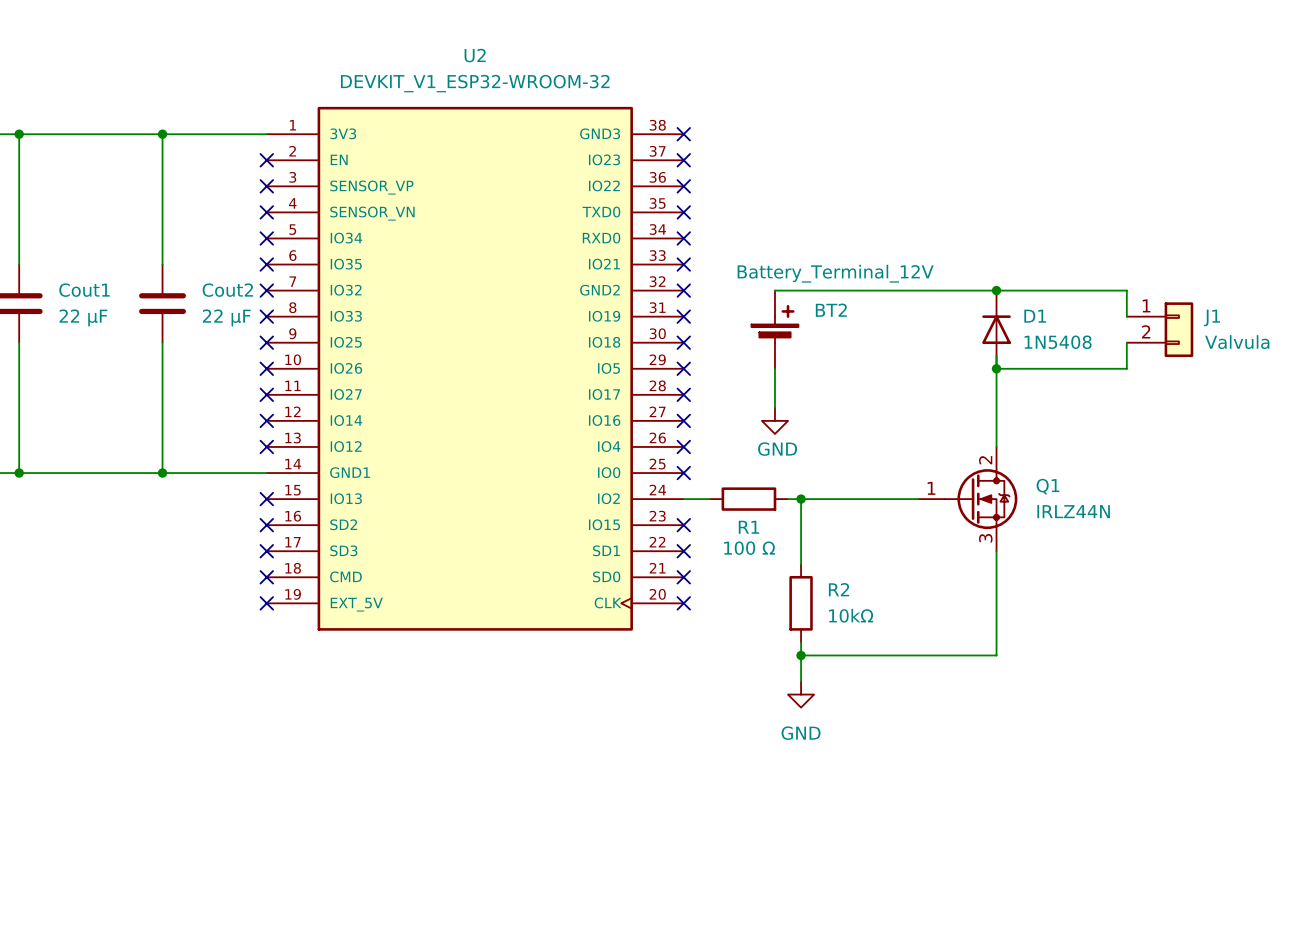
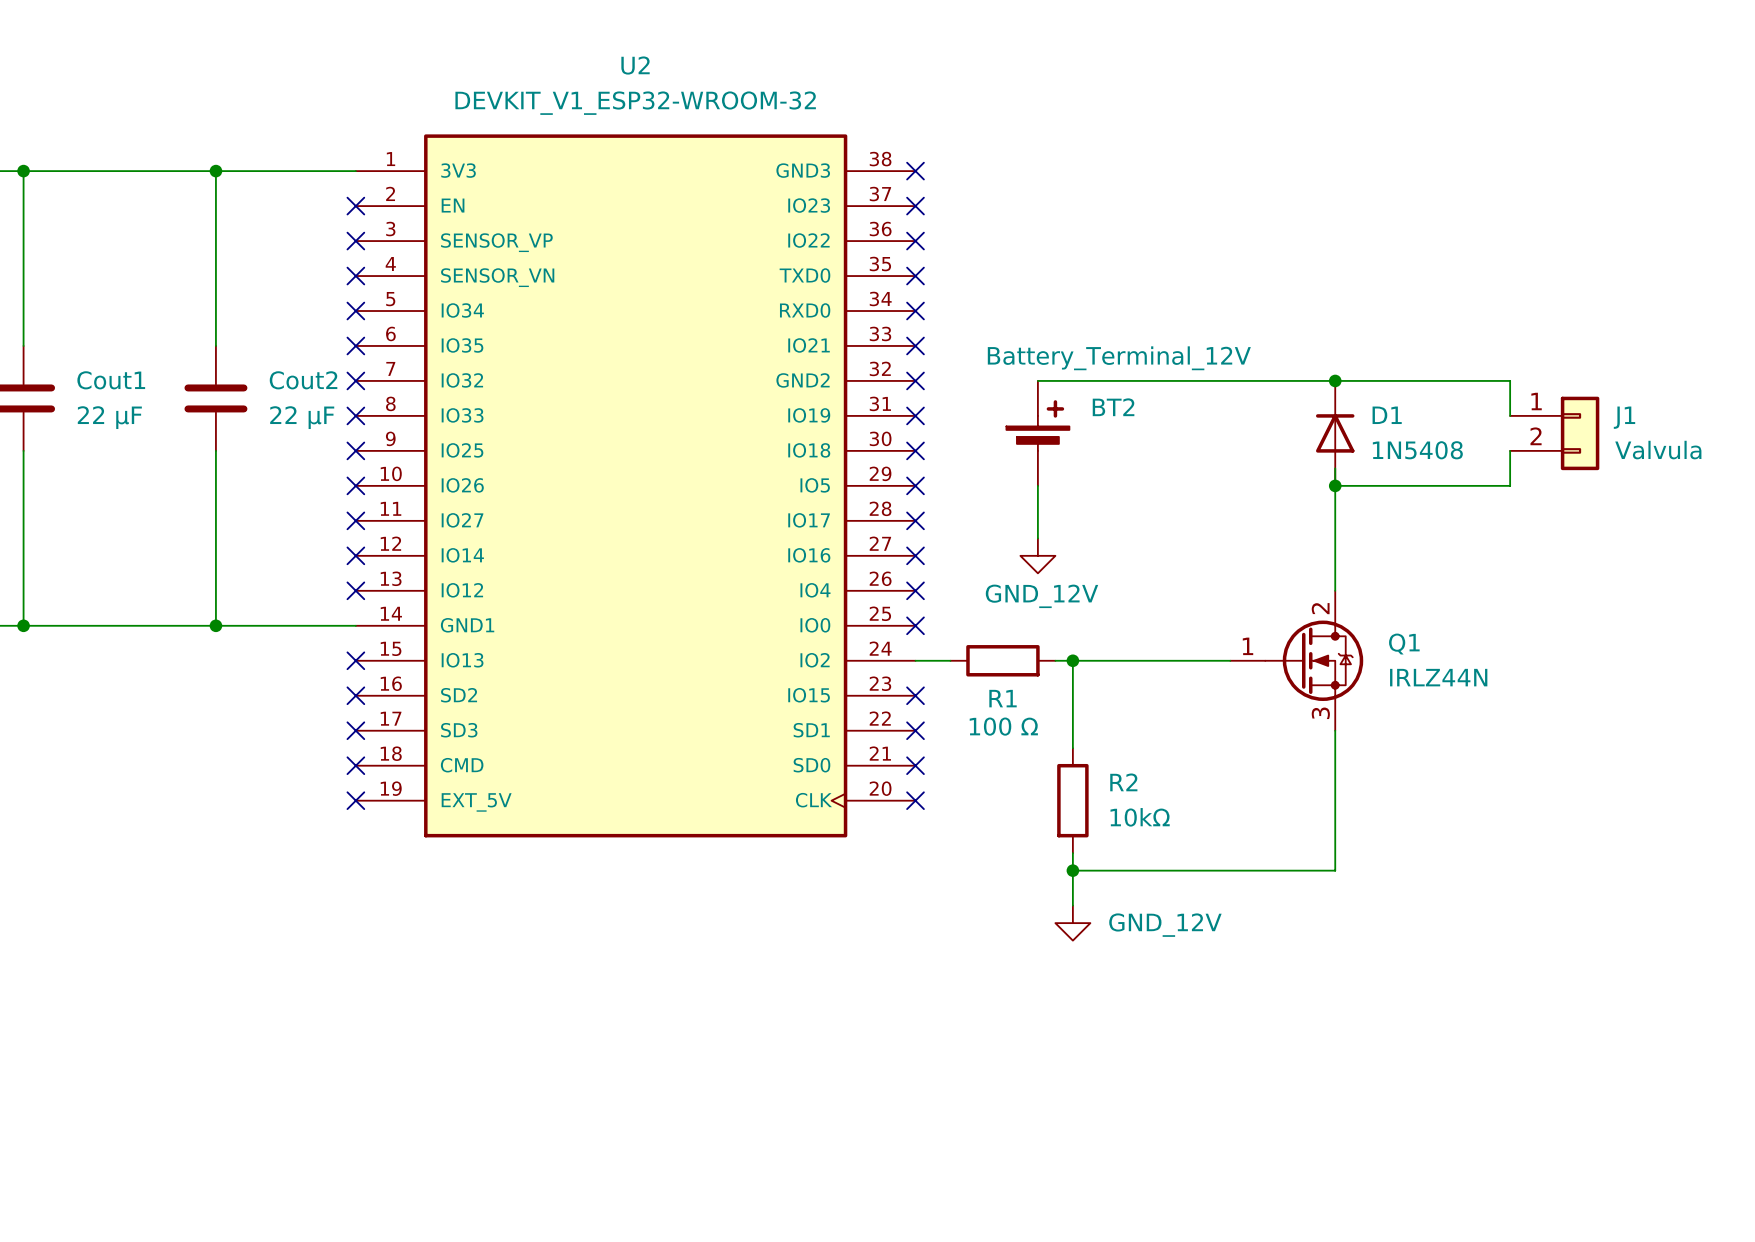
power symbol: GND (774, 420) -> GND_12V (1037, 555)
power symbol: GND (801, 694) -> GND_12V (1072, 923)

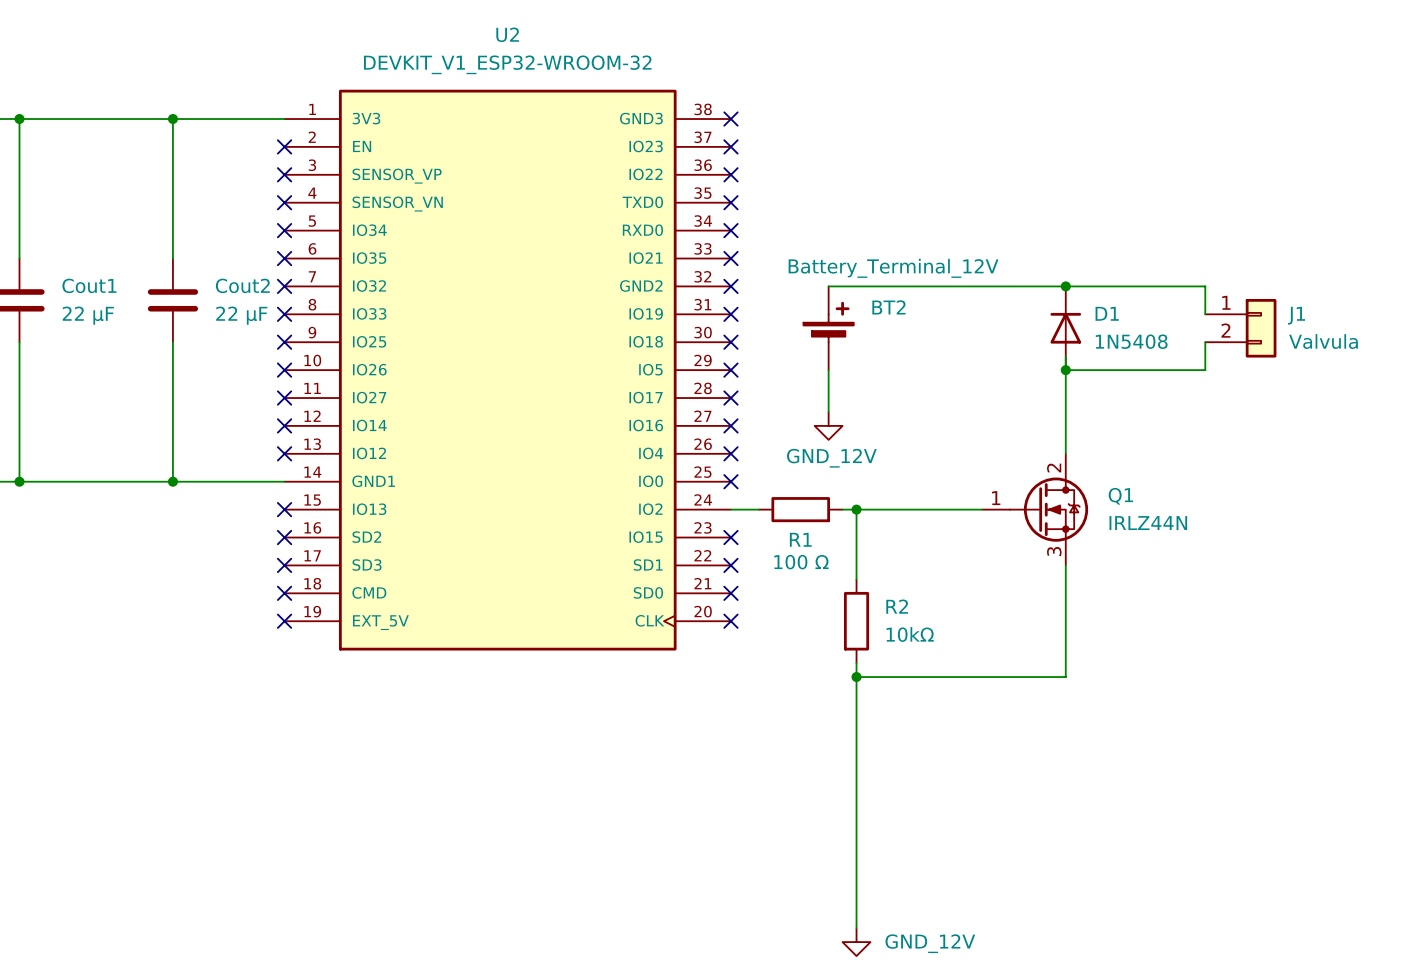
wire: none -> (856, 704) (856, 928)
power symbol position: GND_12V (1072, 923) -> GND_12V (856, 942)

